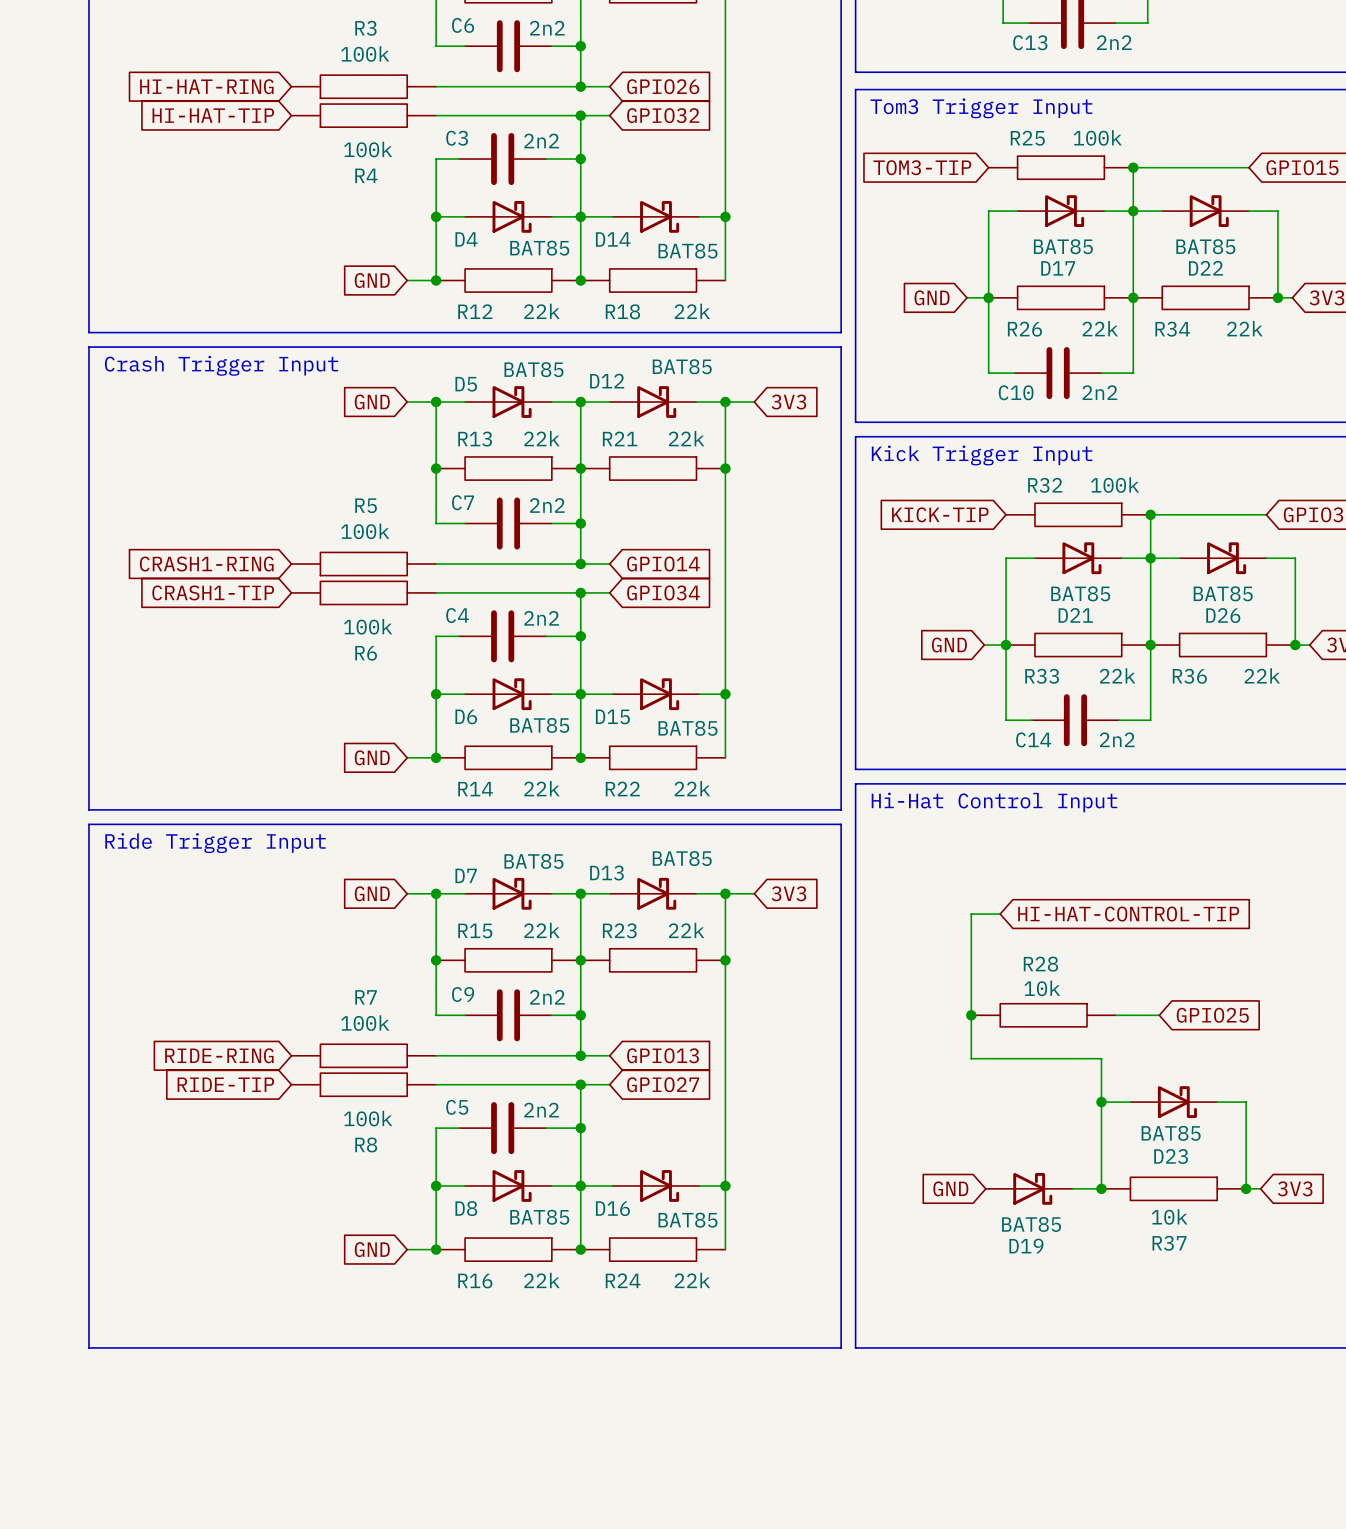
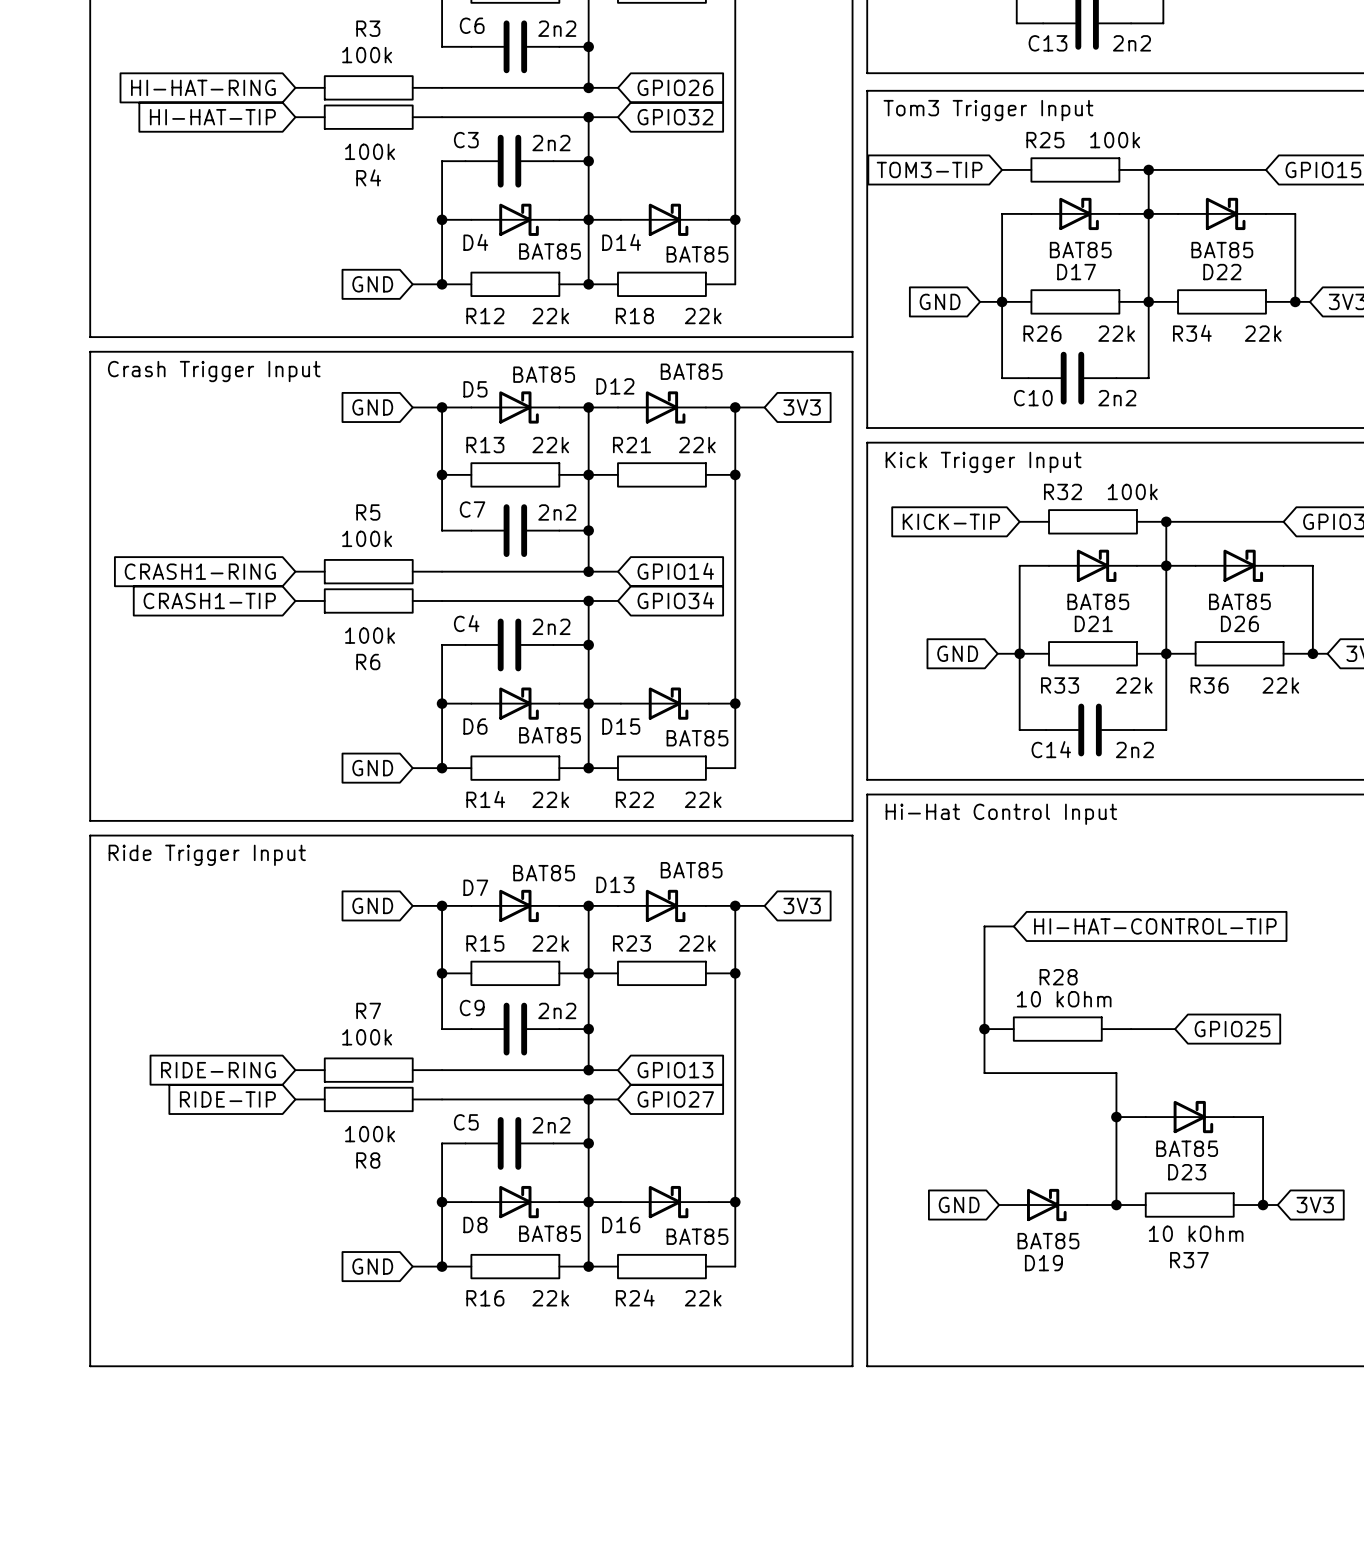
R28 value: 10k (1042, 988) -> 10 kOhm (1064, 999)
R37 value: 10k (1169, 1216) -> 10 kOhm (1196, 1233)

